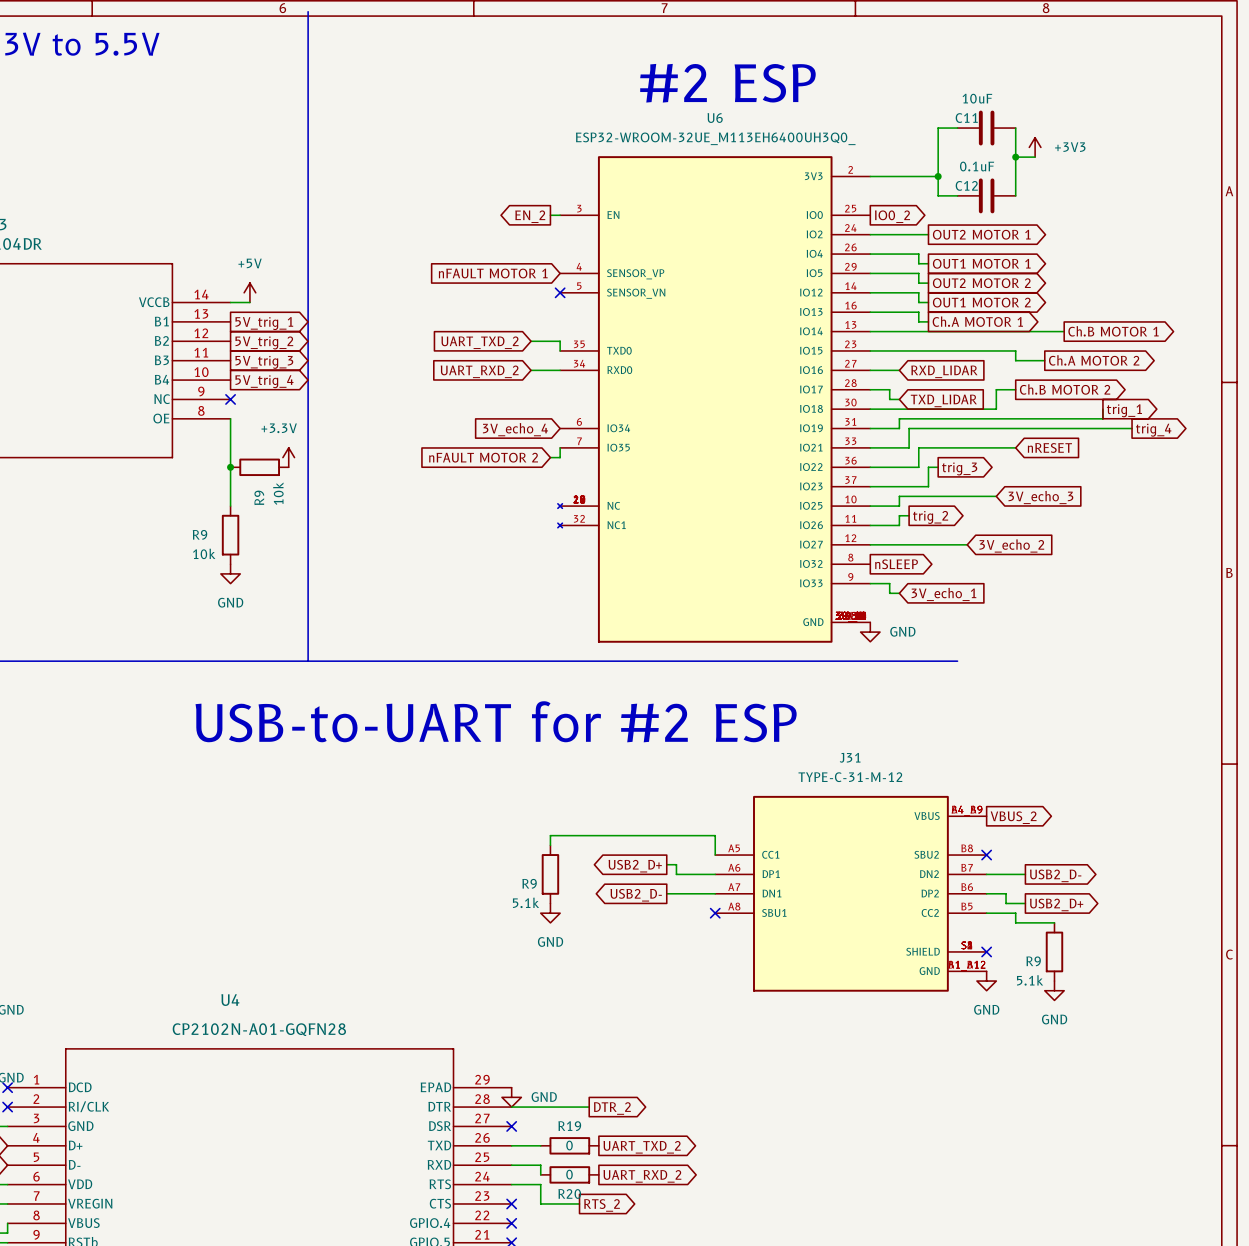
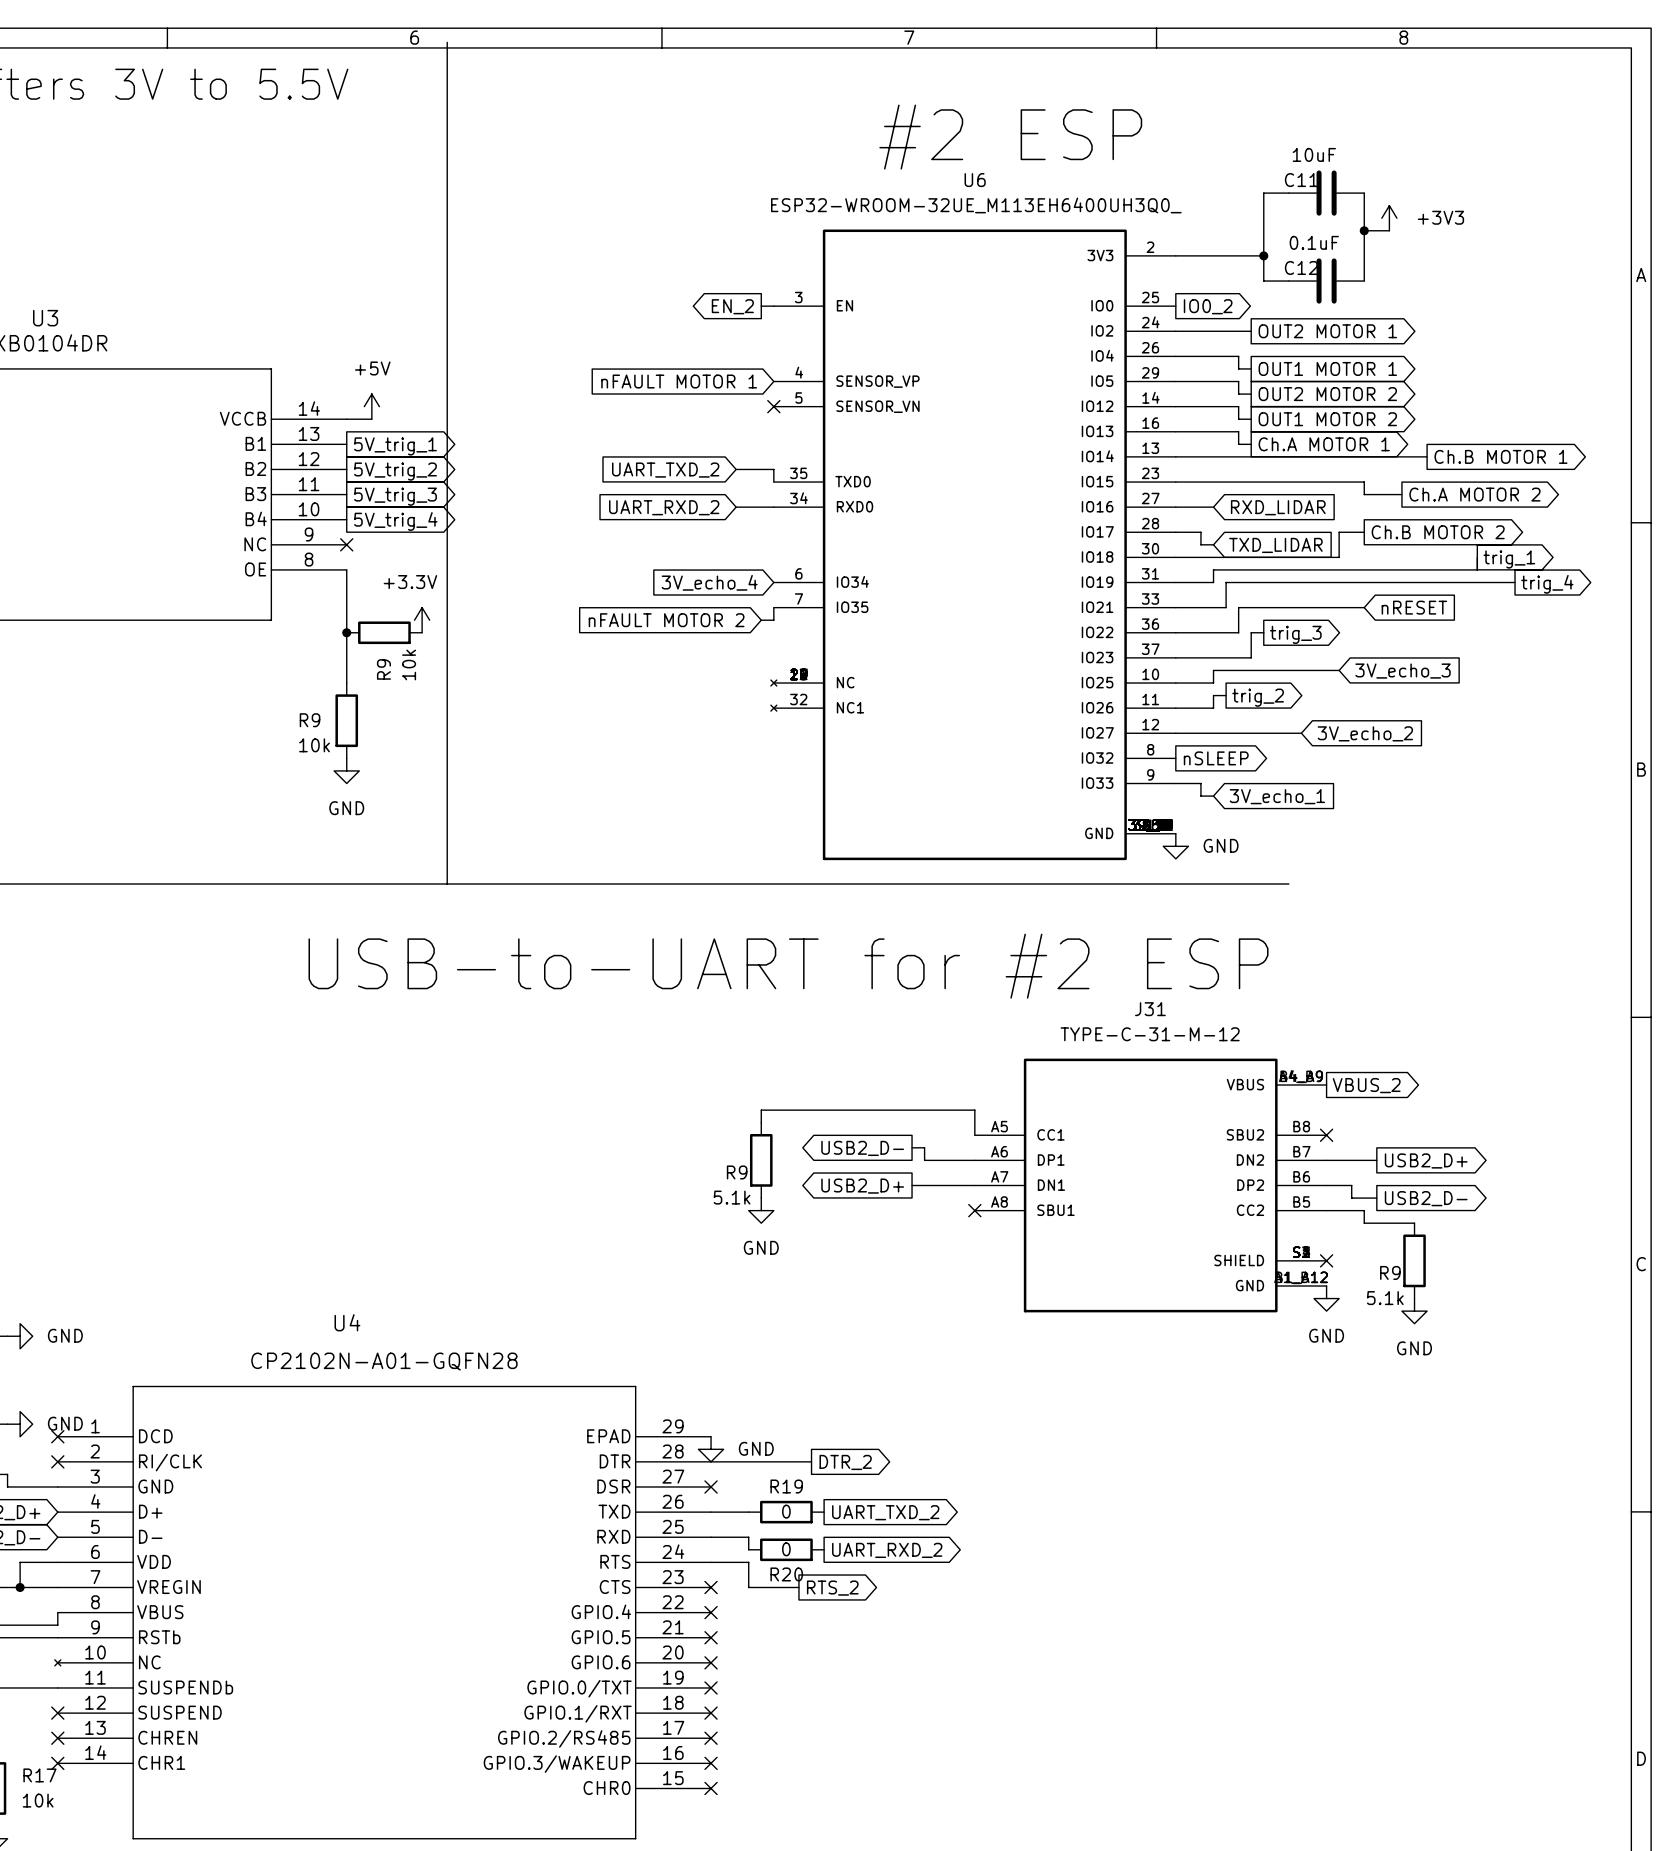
global label: USB2_D+ (635, 866) -> USB2_D- (862, 1148)
global label: USB2_D- (1055, 875) -> USB2_D+ (1426, 1160)
global label: USB2_D- (636, 895) -> USB2_D+ (862, 1186)
global label: USB2_D+ (1056, 904) -> USB2_D- (1426, 1198)

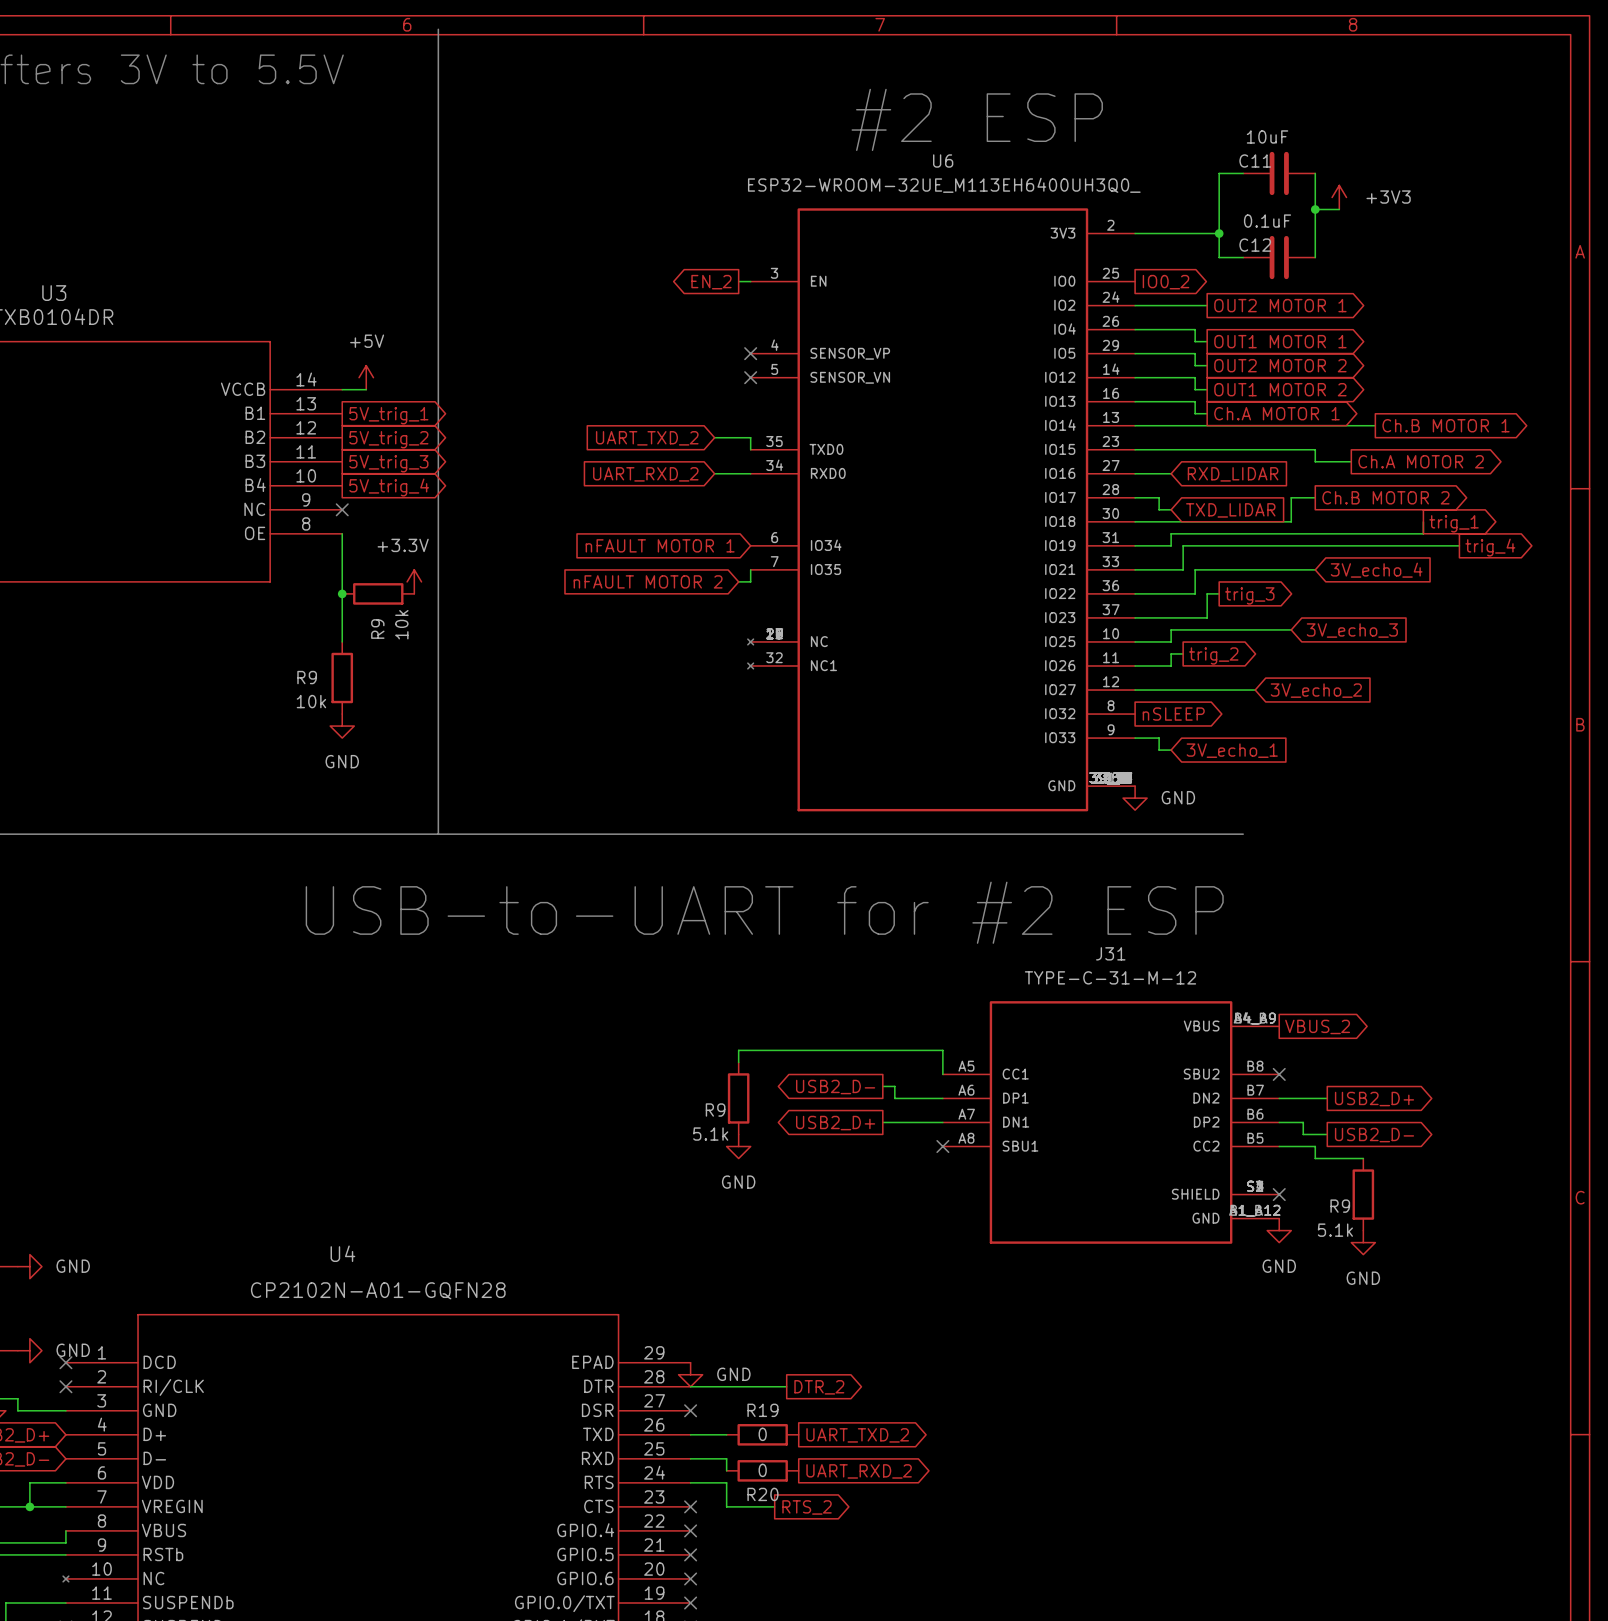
global label: nFAULT MOTOR 1 (679, 381) -> none
no-connect mark: none -> (750, 353)
global label: 3V_echo_4 (709, 582) -> nFAULT MOTOR 1 (660, 545)
global label: nRESET (1414, 607) -> 3V_echo_4 (1376, 570)

